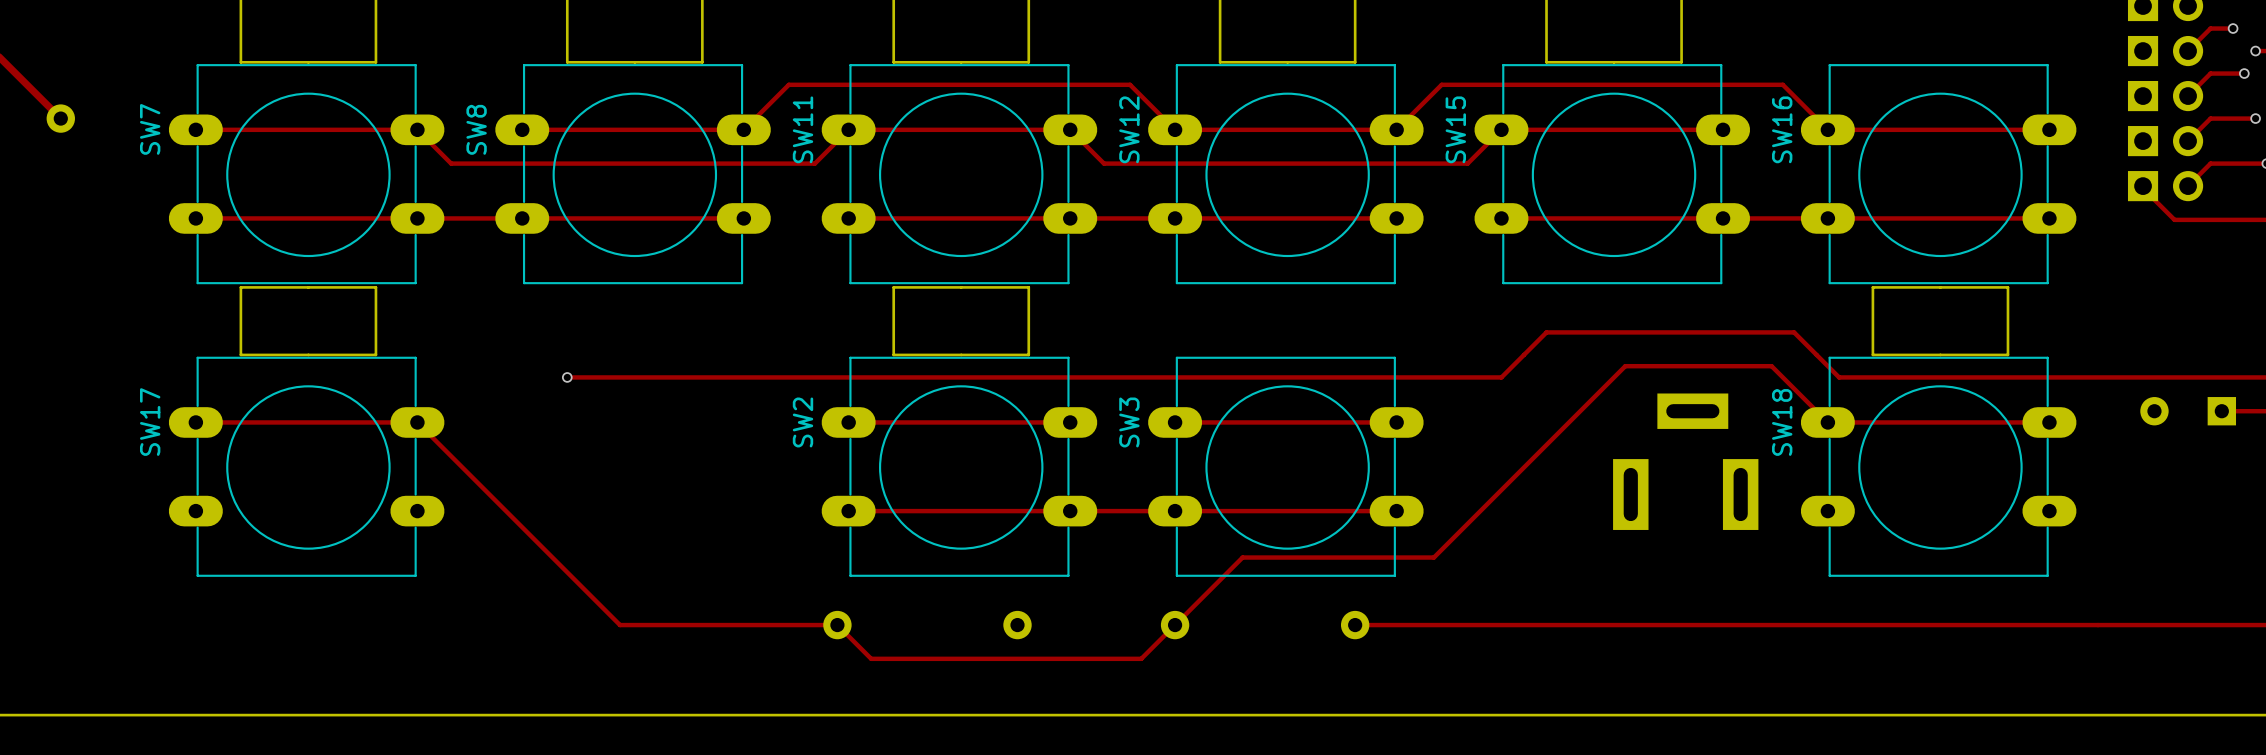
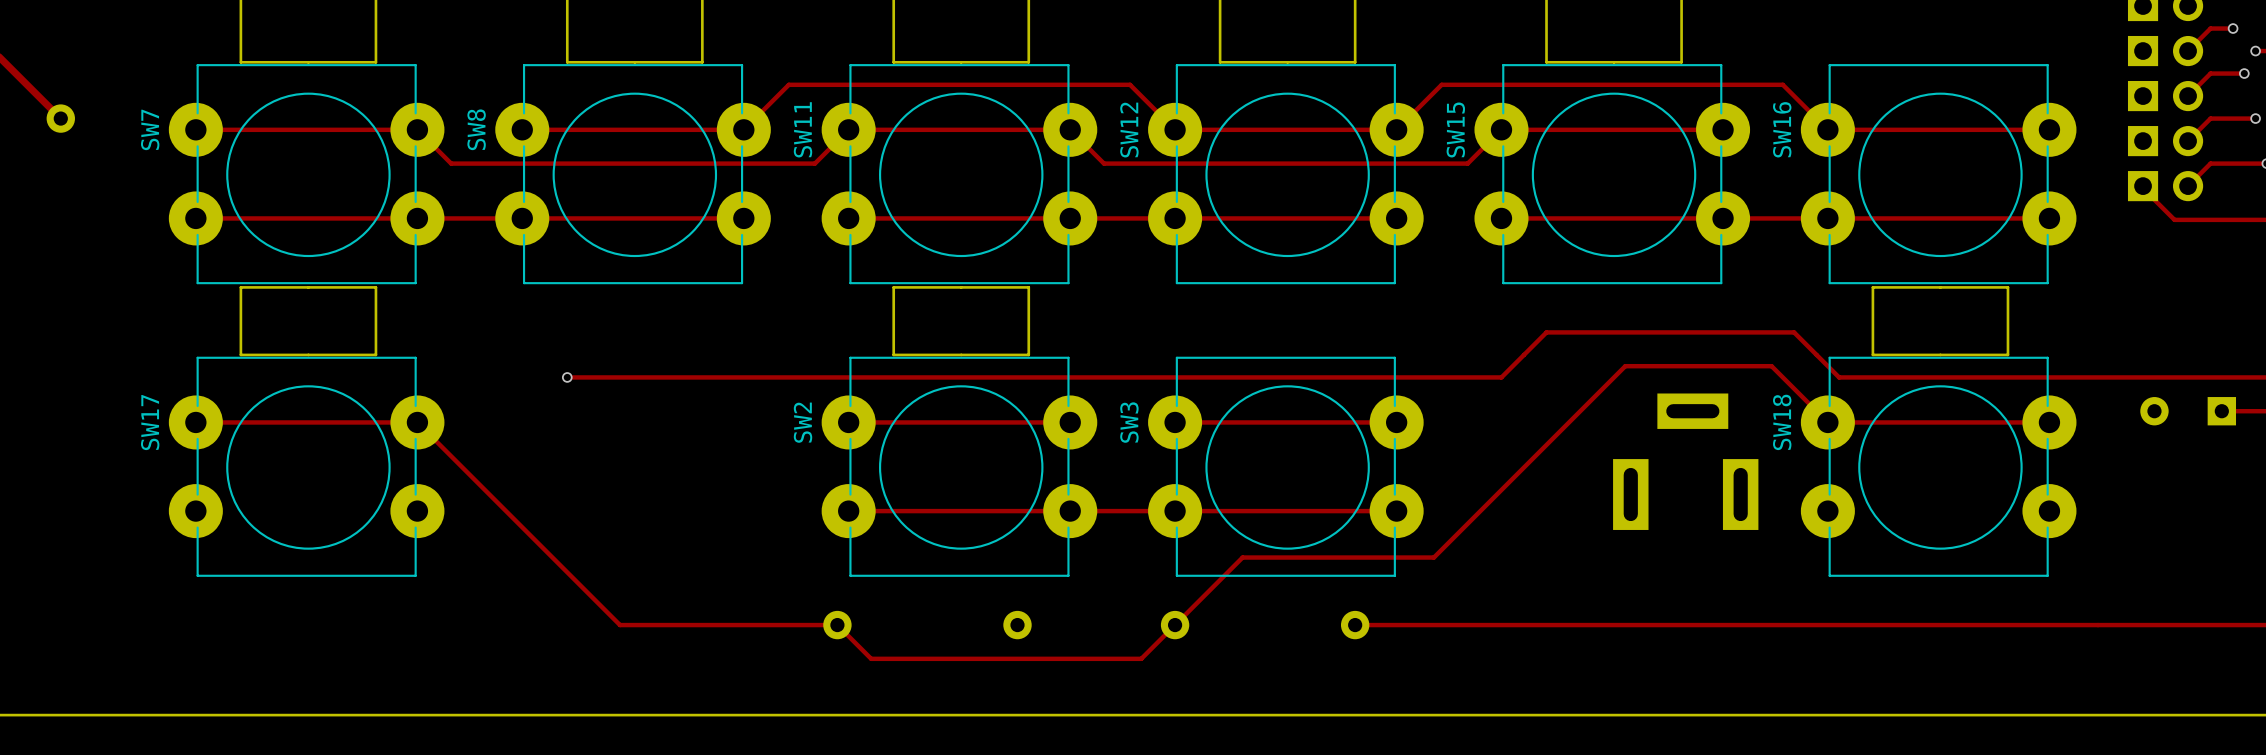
SW7 footprint: [168, 64, 445, 285] -> [168, 64, 445, 285]
SW8 footprint: [495, 64, 771, 285] -> [495, 64, 771, 285]
SW11 footprint: [821, 64, 1098, 285] -> [821, 64, 1098, 285]
SW12 footprint: [1148, 64, 1424, 285] -> [1148, 64, 1424, 285]
SW15 footprint: [1474, 64, 1751, 285] -> [1474, 64, 1751, 285]
SW16 footprint: [1800, 64, 2077, 285] -> [1800, 64, 2077, 285]
SW17 footprint: [168, 356, 445, 577] -> [168, 356, 445, 577]
SW2 footprint: [821, 356, 1098, 577] -> [821, 356, 1098, 577]
SW3 footprint: [1148, 356, 1424, 577] -> [1148, 356, 1424, 577]
SW18 footprint: [1800, 356, 2077, 577] -> [1800, 356, 2077, 577]

